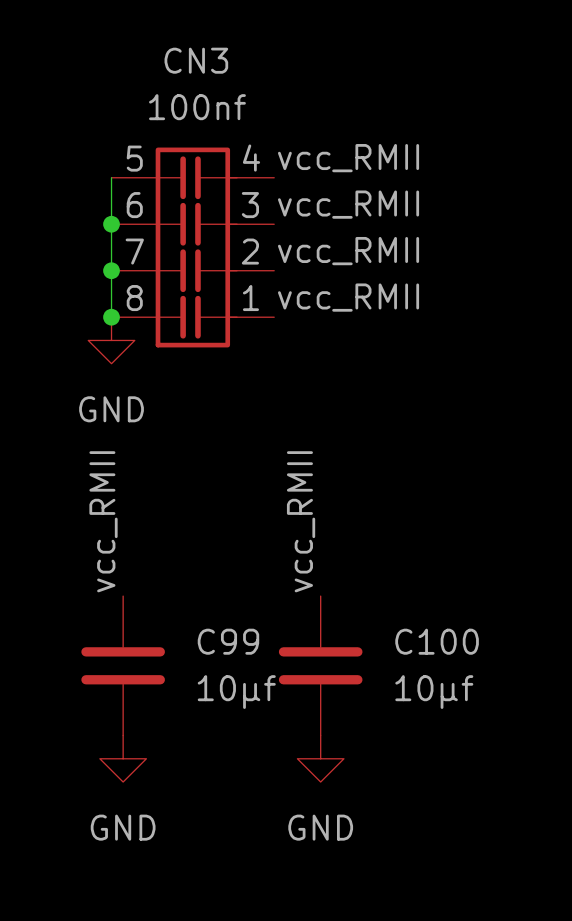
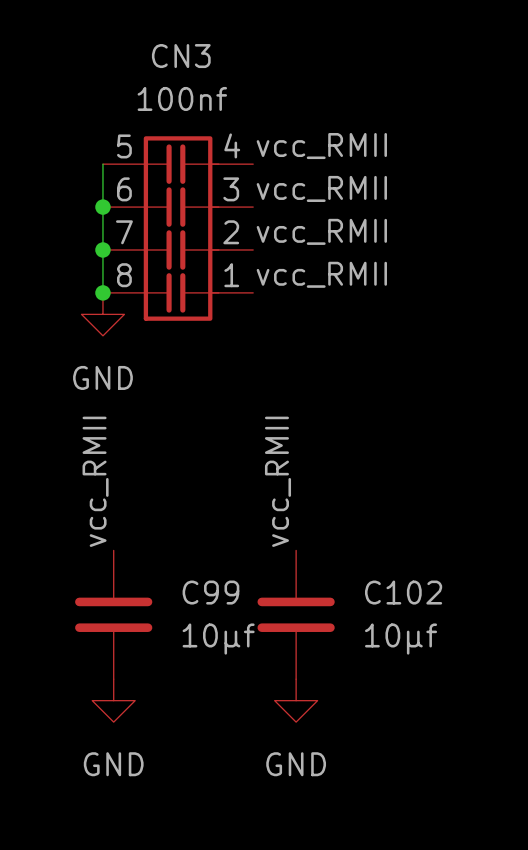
C100 name: C100 (437, 641) -> C102 (403, 592)

